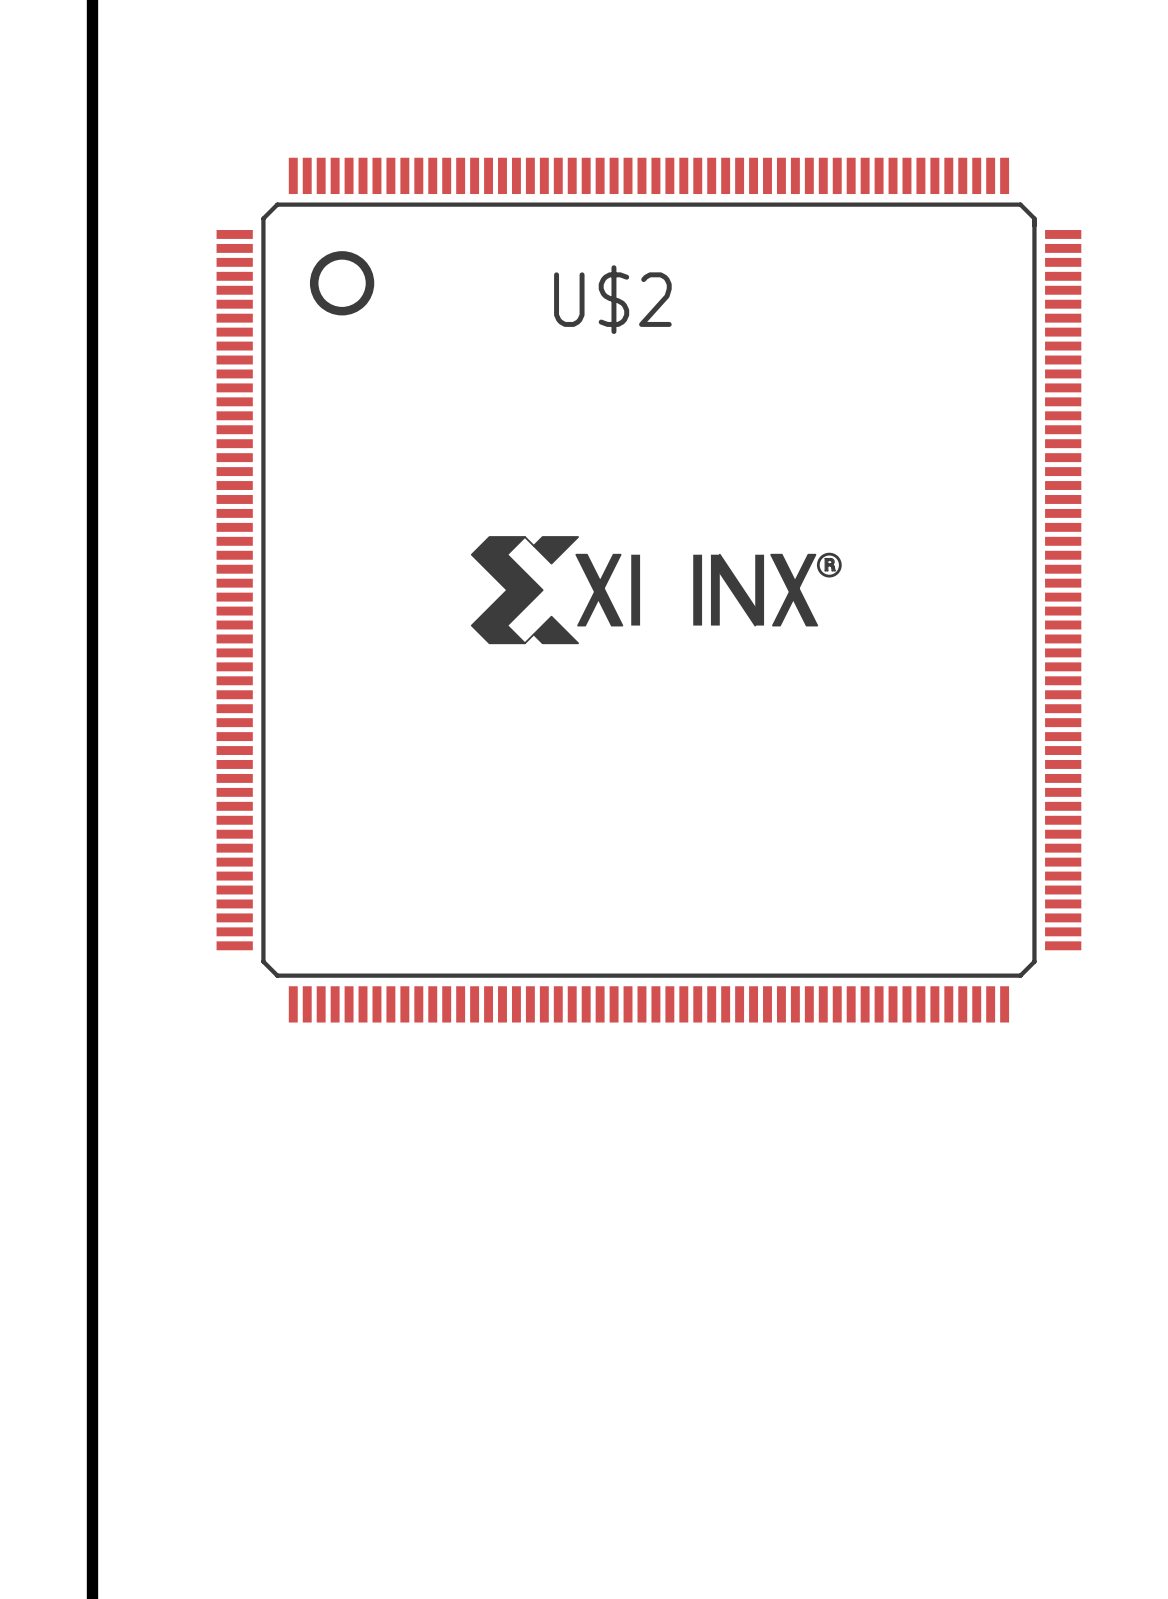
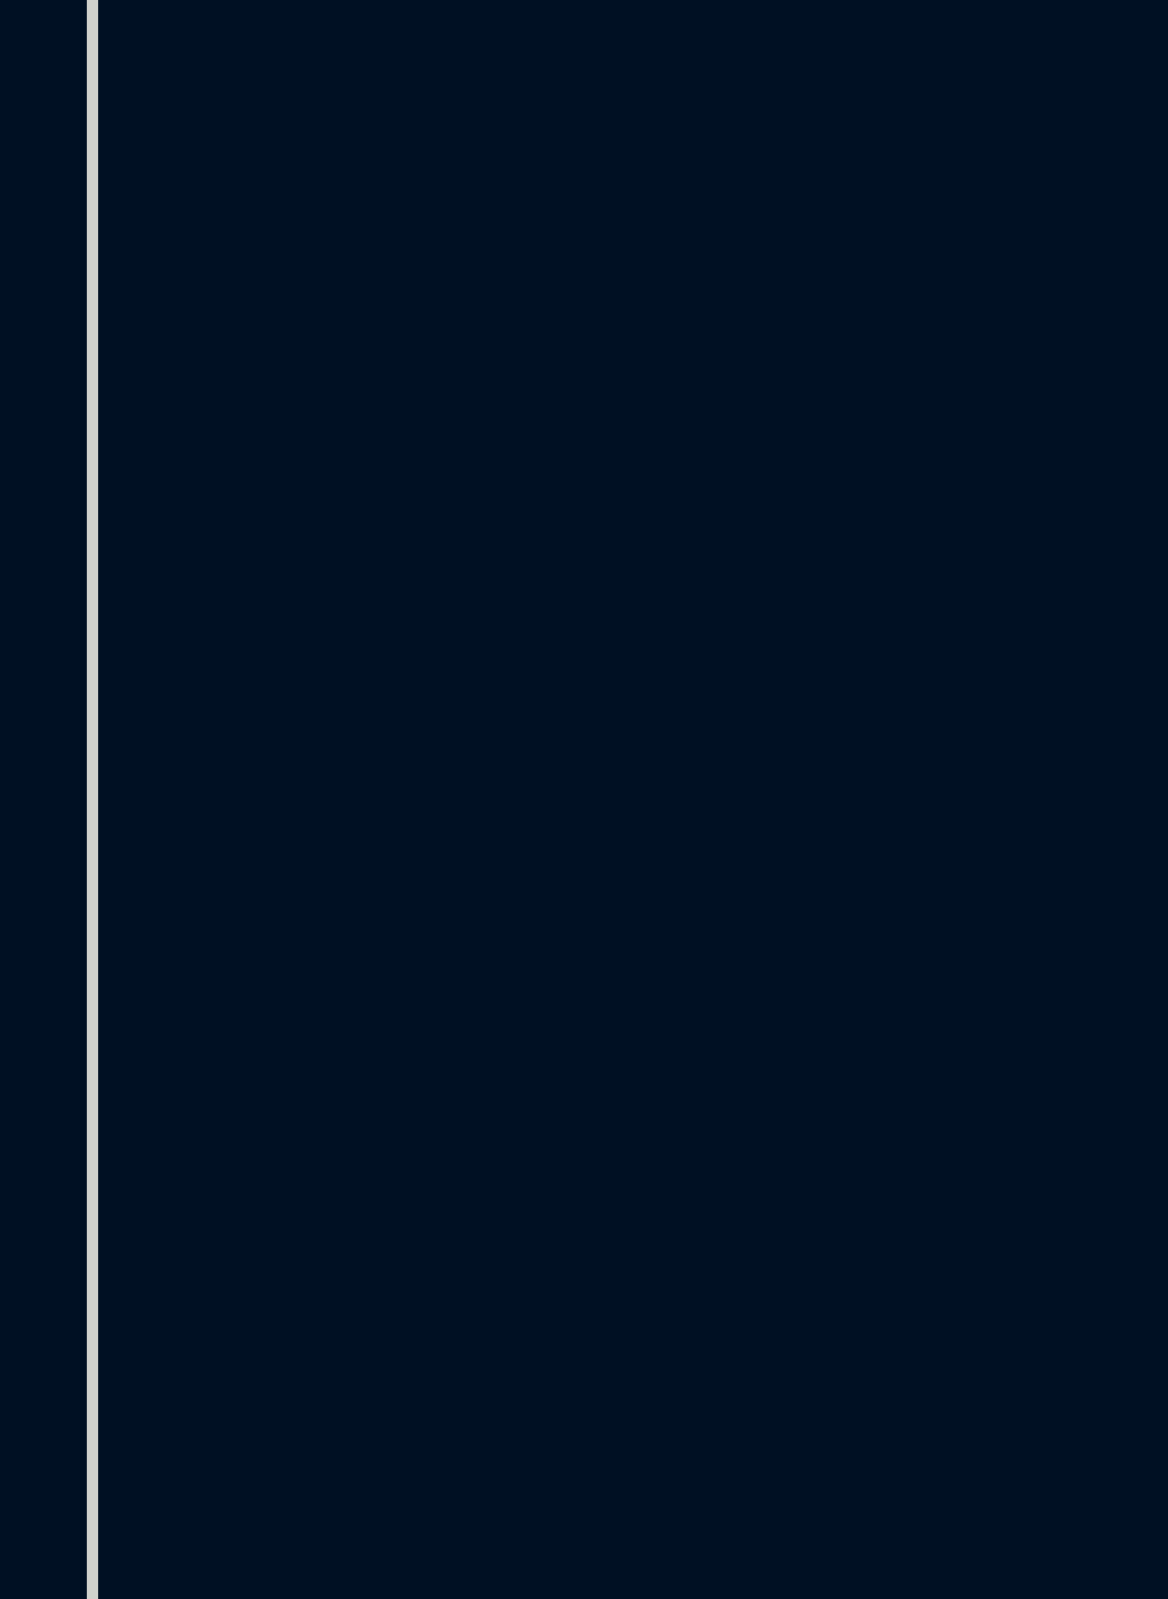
U$2: (648, 590) -> none

